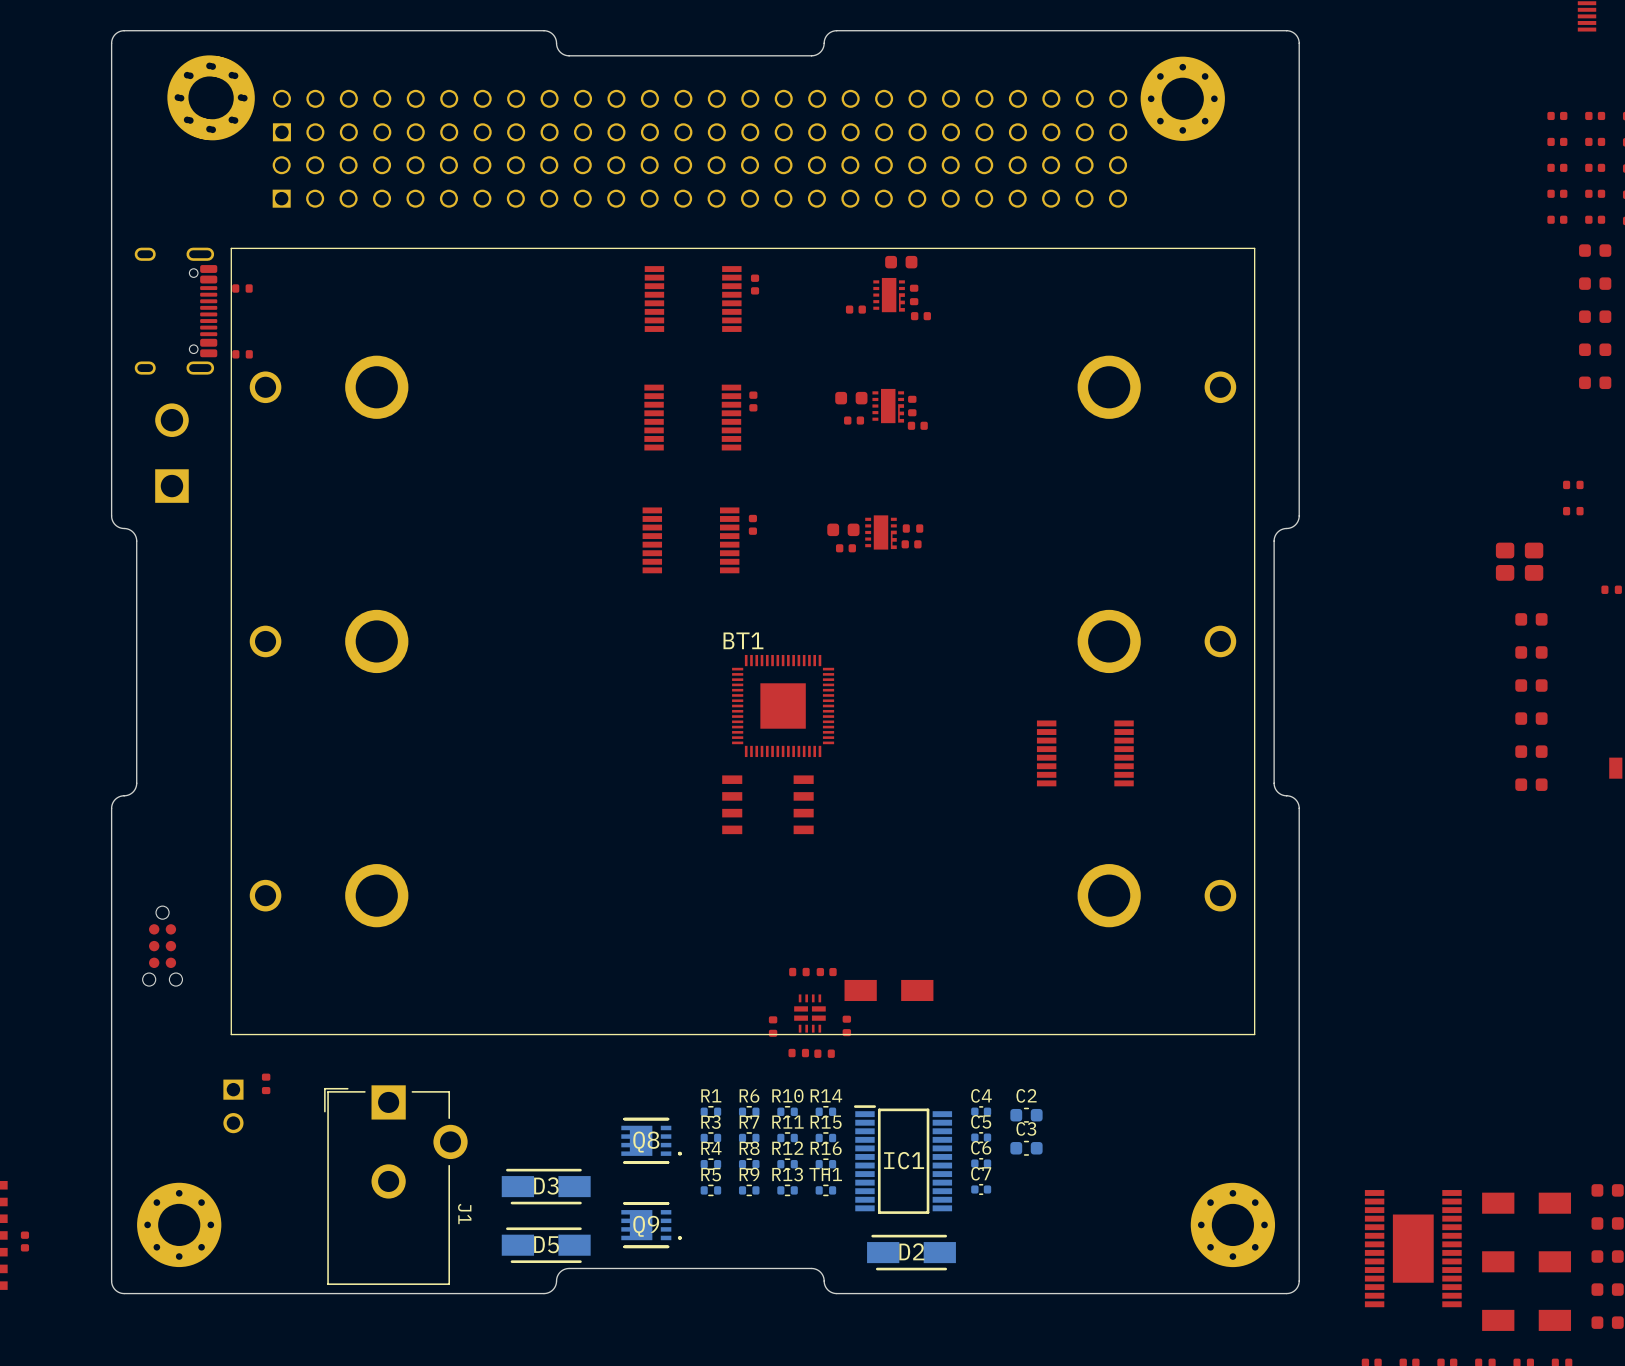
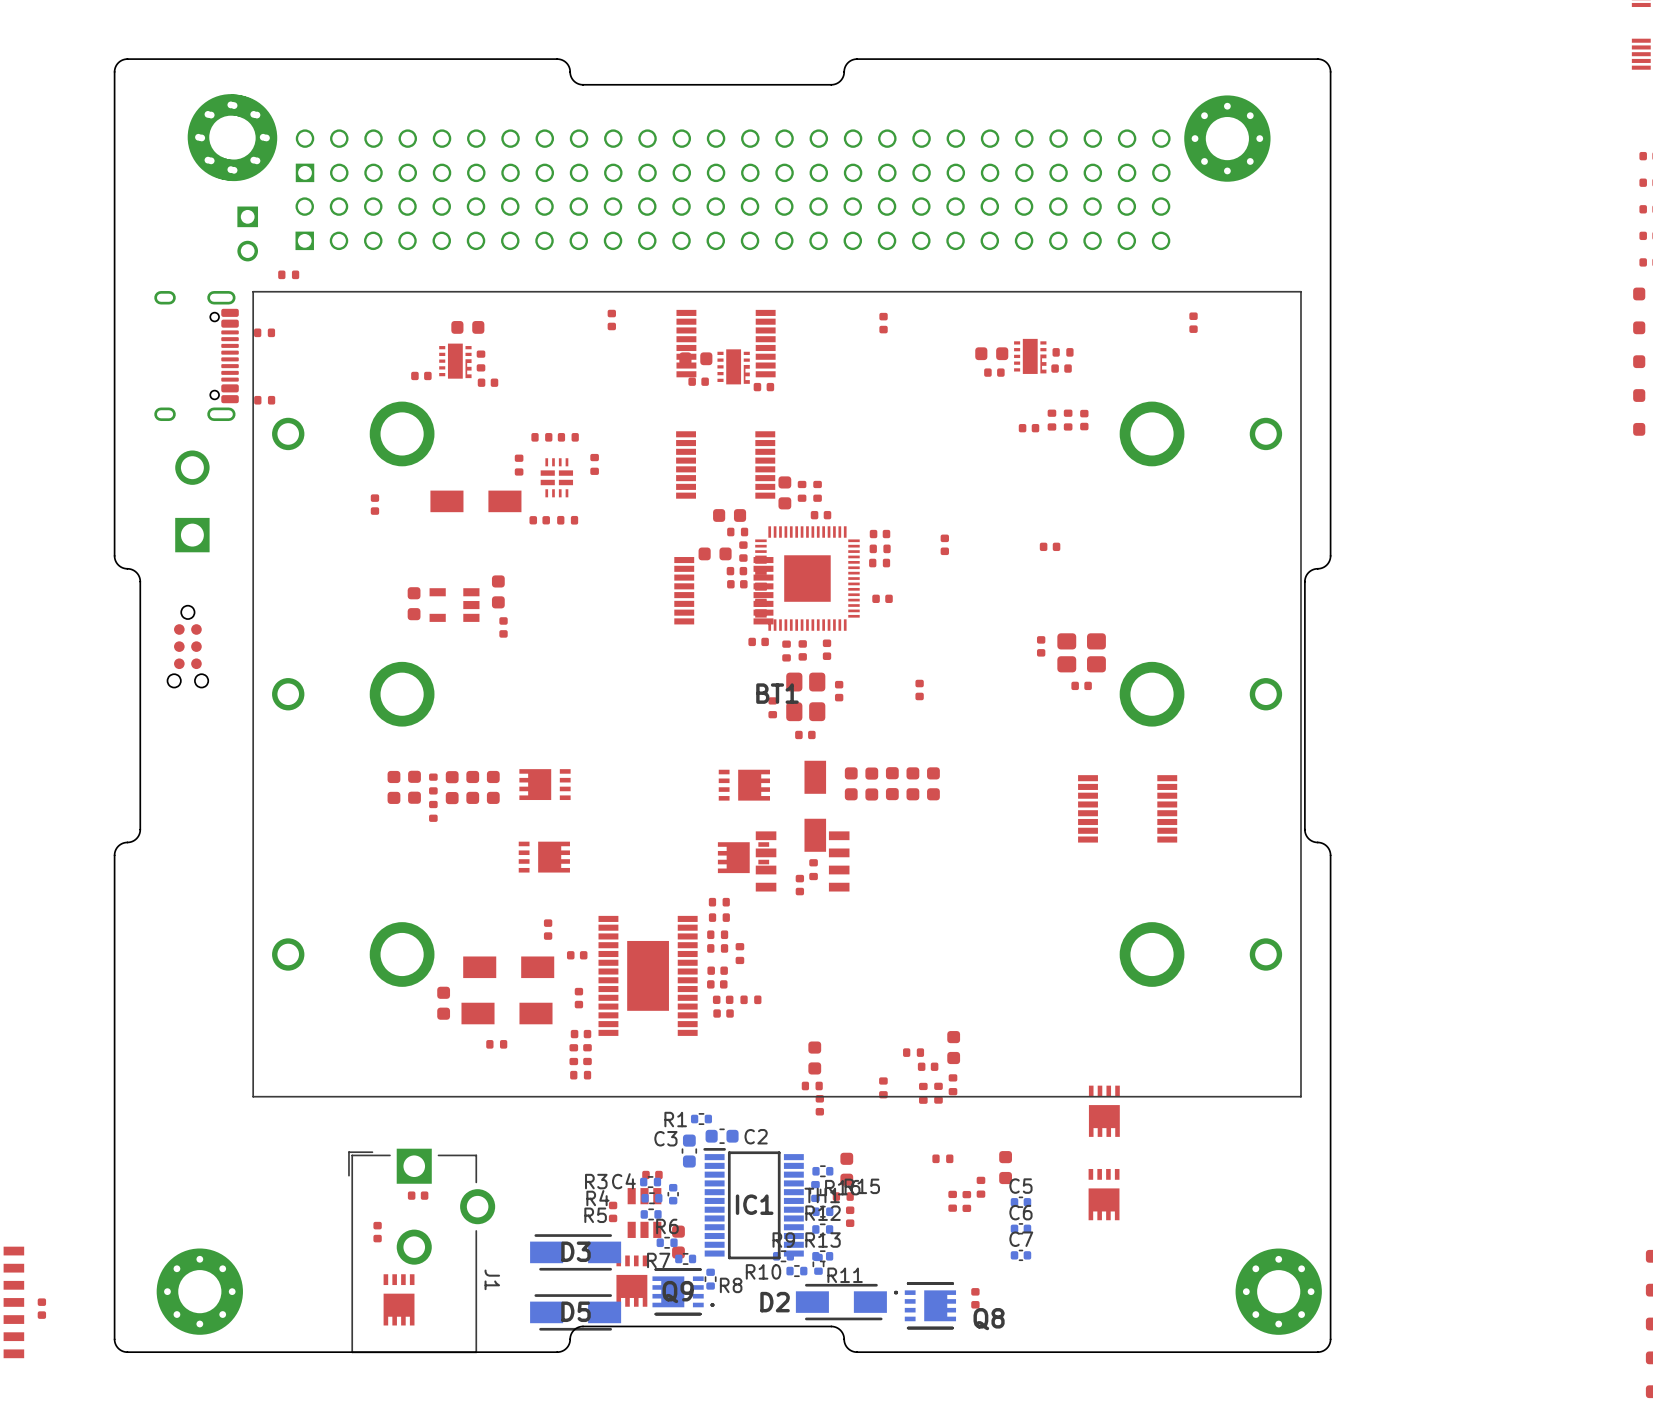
board edge: (1286, 30) (836, 30) (827, 34) (821, 50) (811, 55) (567, 55) (558, 49) (552, 34) (544, 30) (124, 30) (115, 34) (111, 43) (111, 515) (115, 524) (131, 531) (136, 539) (136, 783) (131, 793) (115, 799) (111, 808) (111, 1281) (115, 1289) (124, 1293) (544, 1293) (553, 1288) (560, 1272) (569, 1268) (813, 1268) (821, 1273) (827, 1289) (836, 1293) (1286, 1293) (1295, 1289) (1299, 1281) (1299, 808) (1294, 798) (1277, 792) (1274, 783) (1274, 539) (1279, 530) (1295, 524) (1299, 515) (1299, 43) (1295, 34) (1286, 30) -> (1317, 59) (857, 59) (847, 62) (841, 79) (831, 84) (581, 84) (572, 78) (566, 62) (557, 59) (127, 59) (118, 62) (114, 71) (114, 555) (118, 565) (135, 571) (140, 579) (140, 829) (135, 839) (118, 846) (114, 855) (114, 1339) (118, 1348) (127, 1352) (557, 1352) (567, 1347) (573, 1330) (583, 1326) (833, 1326) (841, 1331) (847, 1348) (857, 1352) (1317, 1352) (1326, 1348) (1330, 1339) (1330, 855) (1325, 845) (1308, 838) (1304, 829) (1304, 580) (1310, 570) (1326, 565) (1330, 555) (1330, 71) (1326, 62) (1317, 59)
part: (1557, 115) -> none
part: (1557, 141) -> none
part: (1557, 167) -> none
part: none -> (247, 233)
part: (1557, 193) -> none
part: (1557, 219) -> none
part: none -> (288, 274)
part: (901, 262) -> none
part: none -> (611, 320)
part: none -> (1193, 322)
part: none -> (467, 327)
part: (755, 284) -> none
part: (914, 294) -> none
part: (889, 295) -> none
part: none -> (1063, 352)
part: none -> (991, 353)
part rotation: 0° (855, 309) -> 90° clockwise (883, 323)
part position: (855, 309) -> (883, 323)
part: none -> (1030, 356)
part: none -> (695, 358)
part: none -> (455, 361)
part: none -> (481, 361)
part position: (920, 316) -> (994, 372)
part: none -> (733, 366)
part: none -> (1061, 368)
part: none -> (421, 375)
part: none -> (698, 381)
part: none -> (488, 382)
part: none -> (763, 387)
part: none -> (1051, 420)
part: none -> (1068, 420)
part: none -> (1084, 420)
part: none -> (1029, 428)
part: none -> (541, 437)
part: none -> (568, 437)
part: (851, 398) -> none
part: (753, 401) -> none
part: (888, 406) -> none
part: (912, 406) -> none
part: none -> (519, 465)
part: none -> (594, 464)
part: (854, 420) -> none
part: (917, 425) -> none
part: none -> (556, 477)
part: none -> (802, 491)
part: none -> (817, 491)
part: none -> (784, 492)
part: none -> (475, 501)
part: none -> (374, 504)
part: none -> (729, 515)
part: none -> (821, 515)
part: none -> (539, 520)
part: none -> (567, 520)
part: none -> (737, 532)
part: (1573, 484) -> none
part: none -> (880, 534)
part: none -> (944, 544)
part: none -> (1050, 546)
part: none -> (880, 548)
part: none -> (743, 551)
part: none -> (715, 553)
part: (1573, 511) -> none
part: none -> (879, 563)
part: none -> (736, 571)
part: (752, 524) -> none
part: (913, 528) -> none
part: (843, 529) -> none
part: (880, 532) -> none
part: none -> (737, 584)
part: none -> (498, 591)
part: (911, 544) -> none
part: none -> (414, 603)
part: none -> (454, 605)
part: (1519, 561) -> none
part: none -> (503, 627)
part: none -> (758, 641)
part: none -> (187, 646)
part: none -> (1041, 646)
part: none -> (802, 650)
part: none -> (827, 649)
part: none -> (786, 651)
part: none -> (1081, 652)
part: (1531, 619) -> none
part: none -> (1081, 685)
part: none -> (919, 689)
part: none -> (839, 691)
part: none -> (805, 696)
part: (1531, 652) -> none
part: none -> (772, 707)
part: none -> (805, 734)
part: (1531, 685) -> none
part position: (783, 706) -> (807, 578)
part: (1531, 718) -> none
part: none -> (851, 783)
part: none -> (892, 783)
part: none -> (912, 783)
part: none -> (933, 783)
part: none -> (433, 784)
part: none -> (545, 784)
part: none -> (871, 784)
part: none -> (744, 785)
part: none -> (393, 787)
part: none -> (414, 787)
part: none -> (452, 787)
part: none -> (472, 787)
part: none -> (493, 787)
part: none -> (815, 806)
part: (1531, 751) -> none
part: none -> (433, 811)
part: (1531, 784) -> none
part: none -> (544, 857)
part: none -> (743, 857)
part: none -> (813, 869)
part: none -> (799, 885)
part: none -> (719, 902)
part: none -> (719, 917)
part: none -> (548, 929)
part: none -> (717, 934)
part: none -> (717, 948)
part: none -> (739, 953)
part: none -> (577, 955)
part: none -> (508, 967)
part: none -> (717, 970)
part: none -> (648, 975)
part: none -> (717, 984)
part: none -> (578, 998)
part: none -> (723, 999)
part: none -> (750, 999)
part: none -> (443, 1003)
part: (162, 946) -> none
part: none -> (507, 1013)
part: none -> (723, 1013)
part: (799, 972) -> none
part: (826, 972) -> none
part: none -> (581, 1034)
part: none -> (496, 1044)
part: none -> (953, 1047)
part: (888, 990) -> none
part: none -> (913, 1052)
part: none -> (573, 1054)
part: none -> (587, 1054)
part: none -> (814, 1058)
part: none -> (928, 1066)
part: none -> (580, 1075)
part: (809, 1013) -> none
part: none -> (952, 1084)
part rotation: 0° (773, 1026) -> 90° clockwise (812, 1085)
part: none -> (923, 1093)
part: none -> (938, 1093)
part: none -> (819, 1105)
part: none -> (1104, 1111)
part: (798, 1053) -> none
part: (824, 1053) -> none
part: (266, 1083) -> none
R1 name position: R1 (711, 1095) -> R1 (675, 1119)
R10 name position: R10 (787, 1095) -> R10 (763, 1271)
part: none -> (942, 1158)
C4 name position: C4 (981, 1095) -> C4 (623, 1181)
C2 name position: C2 (1026, 1095) -> C2 (756, 1136)
part: none -> (1005, 1167)
part: none -> (846, 1169)
part: (233, 1106) -> none
part: none -> (652, 1174)
R1 position: (710, 1111) -> (701, 1119)
R6 position: (749, 1111) -> (667, 1242)
R10 position: (787, 1111) -> (796, 1271)
R14: (825, 1111) -> none
C4 rotation: 0° (981, 1111) -> 90° clockwise (673, 1194)
C4 position: (981, 1111) -> (673, 1194)
C2 position: (1026, 1115) -> (722, 1136)
R3 name position: R3 (710, 1122) -> R3 (596, 1181)
R7 name position: R7 (749, 1122) -> R7 (658, 1260)
part: none -> (980, 1187)
part: none -> (1104, 1194)
part: none -> (418, 1195)
part: none -> (843, 1196)
part: none -> (952, 1201)
part: none -> (966, 1201)
R3 position: (710, 1137) -> (650, 1182)
R7 position: (749, 1137) -> (685, 1258)
R11 rotation: 0° (787, 1137) -> 90° clockwise (818, 1264)
R11 position: (787, 1137) -> (818, 1264)
R15 position: (825, 1137) -> (822, 1171)
Q8 rotation: 0° (651, 1140) -> 180° (925, 1305)
Q8 position: (651, 1140) -> (925, 1305)
Q8 name position: Q8 (646, 1142) -> Q8 (989, 1319)
part: none -> (613, 1211)
part: none -> (644, 1213)
R4 name position: R4 (711, 1148) -> R4 (597, 1198)
C3 rotation: 0° (1026, 1148) -> 90° clockwise (689, 1151)
C3 position: (1026, 1148) -> (689, 1151)
part: none -> (850, 1216)
IC1 position: (903, 1159) -> (753, 1203)
R4 position: (710, 1164) -> (651, 1198)
R8 rotation: 0° (749, 1164) -> 90° clockwise (710, 1279)
R8 position: (749, 1164) -> (710, 1279)
R16 rotation: 0° (825, 1164) -> 90° clockwise (815, 1191)
R16 position: (825, 1164) -> (815, 1191)
part: none -> (377, 1232)
R5 name position: R5 (711, 1174) -> R5 (595, 1215)
part: none -> (678, 1242)
R5 position: (710, 1190) -> (651, 1214)
TH1 position: (825, 1190) -> (822, 1211)
part: (1526, 1203) -> none
part: none -> (631, 1281)
part: none -> (975, 1298)
part: none -> (399, 1299)
part: (1413, 1248) -> none
D2 name position: D2 (911, 1251) -> D2 (775, 1302)
D2 rotation: 0° (911, 1252) -> 180° (841, 1302)
D2 position: (911, 1252) -> (841, 1302)
part: (1526, 1261) -> none
part: (1526, 1320) -> none

